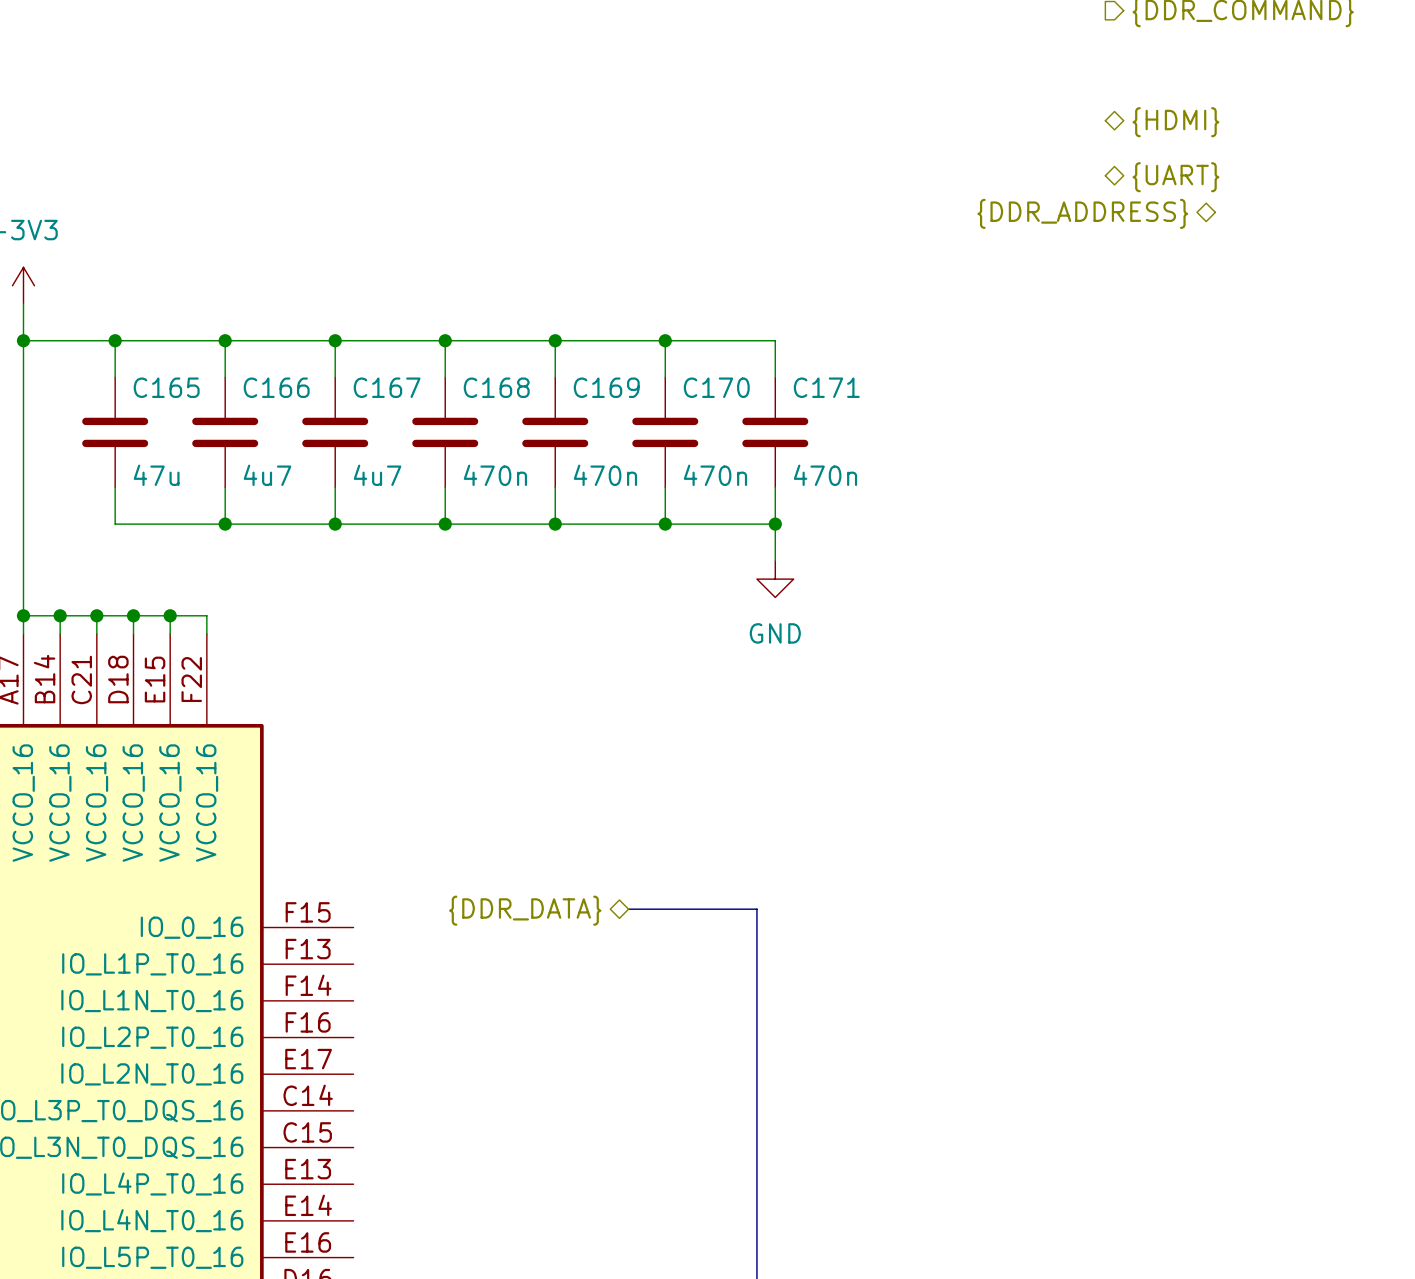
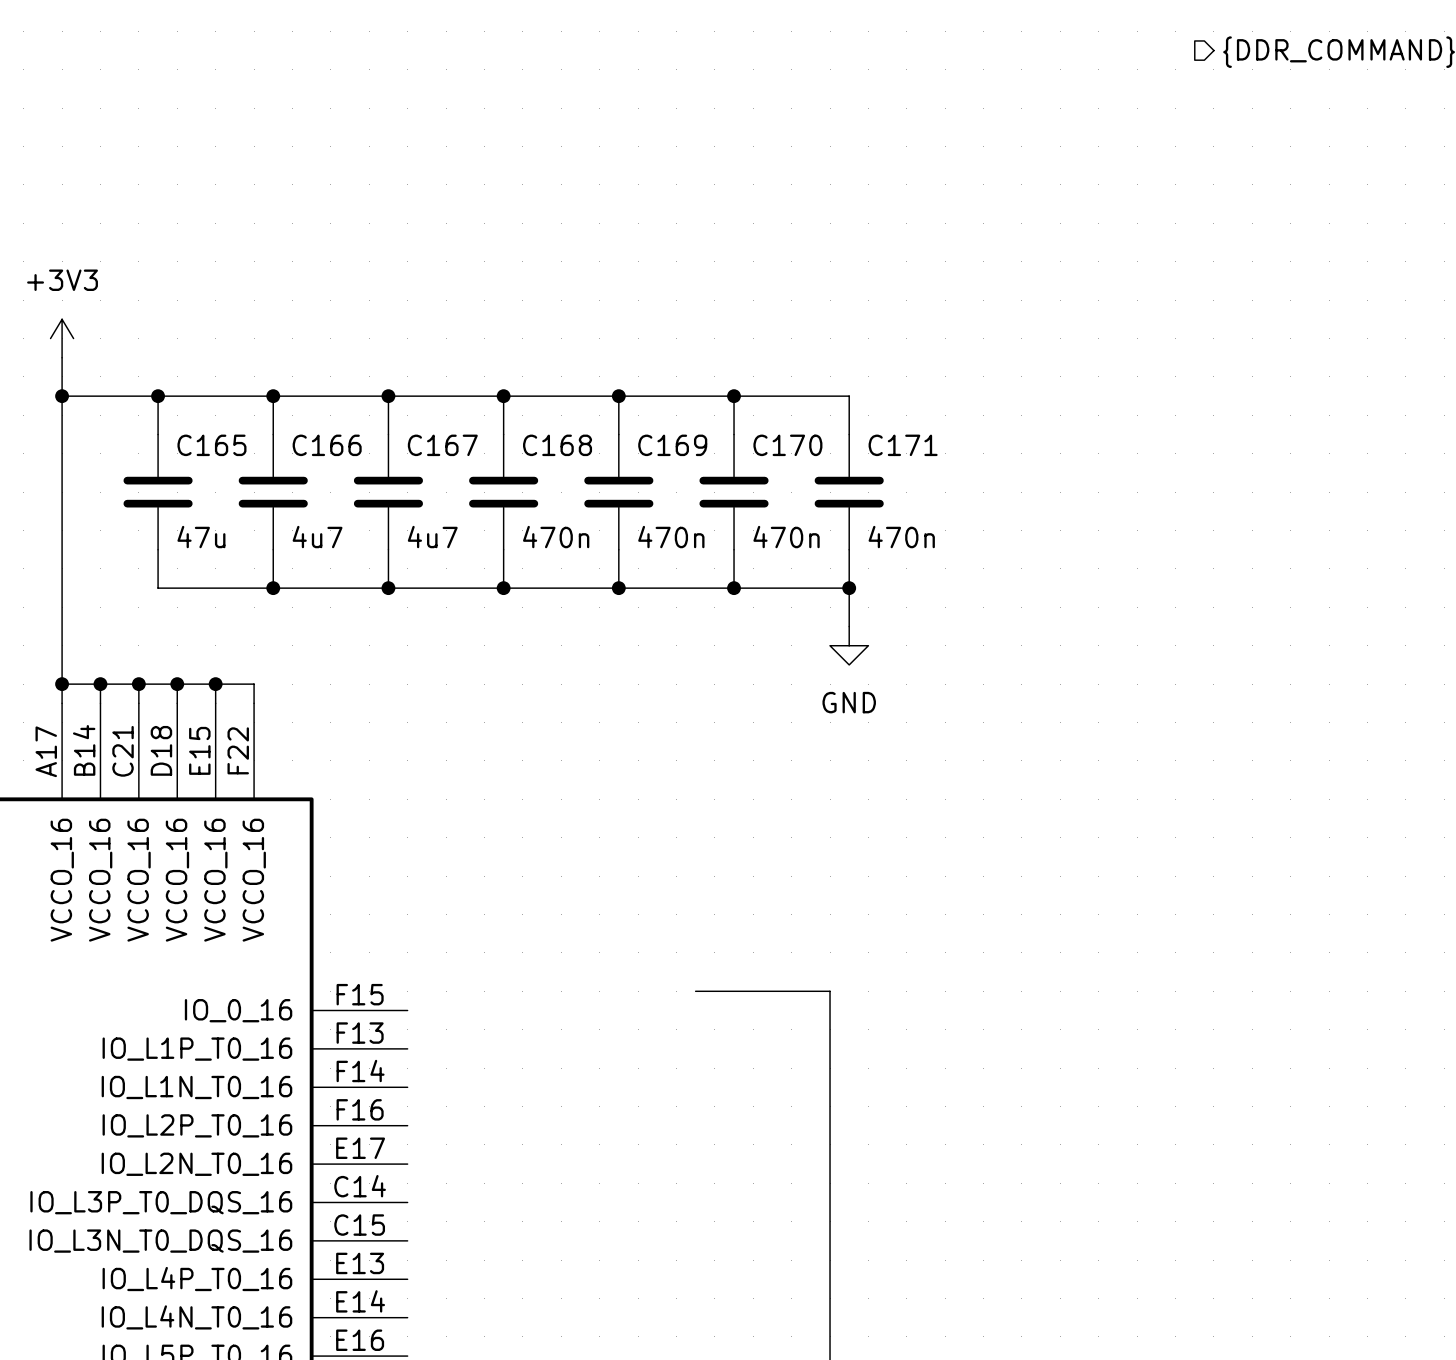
hierarchical label: {HDMI} (1175, 122) -> none
hierarchical label: {UART} (1175, 177) -> none
hierarchical label: {DDR_ADDRESS} (1082, 213) -> none
hierarchical label: {DDR_DATA} (525, 910) -> none

